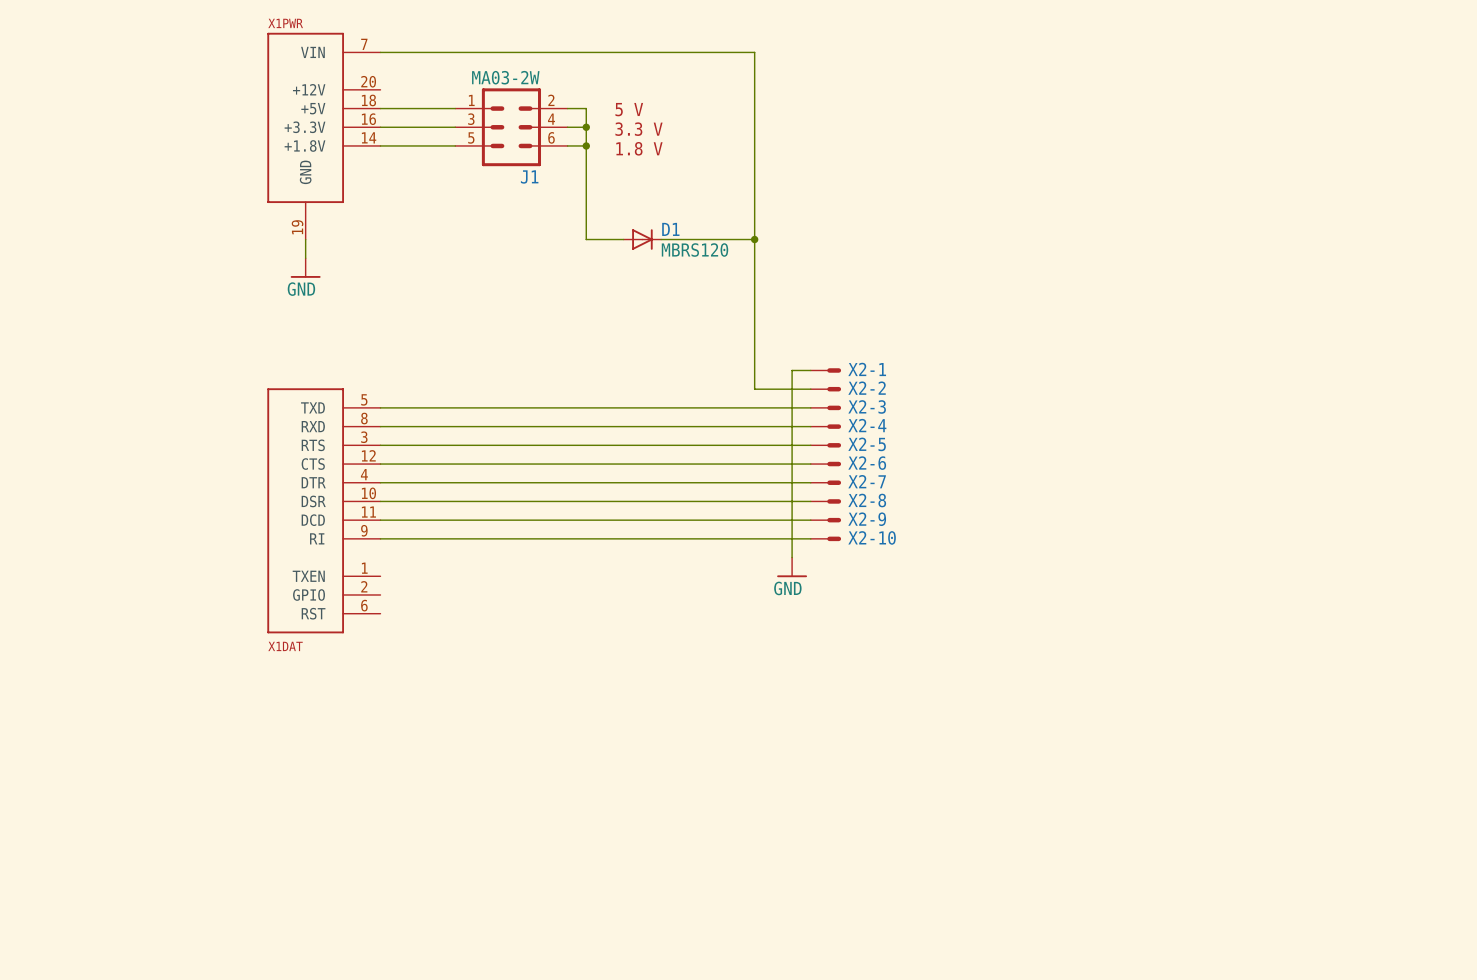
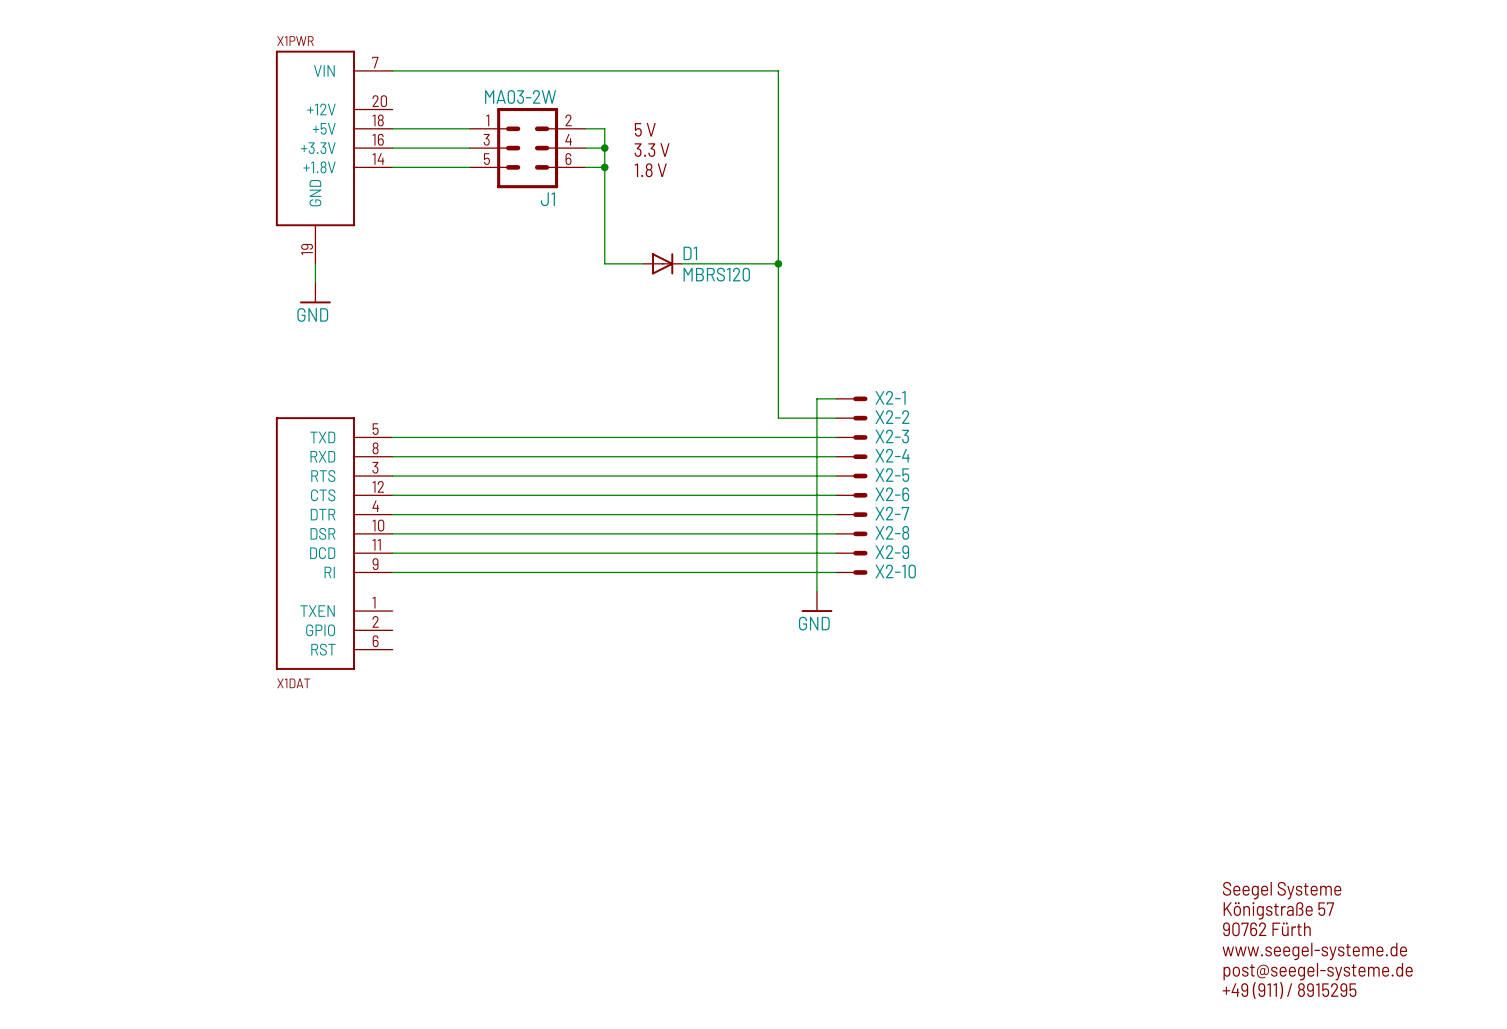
text: none -> Seegel Systeme (1282, 890)
text: none -> Königstraße 57 (1278, 910)
text: none -> 90762 Fürth (1266, 929)
text: none -> www.seegel-systeme.de (1314, 951)
text: none -> post@seegel-systeme.de (1318, 971)
text: none -> +49 (911) / 8915295 (1289, 990)

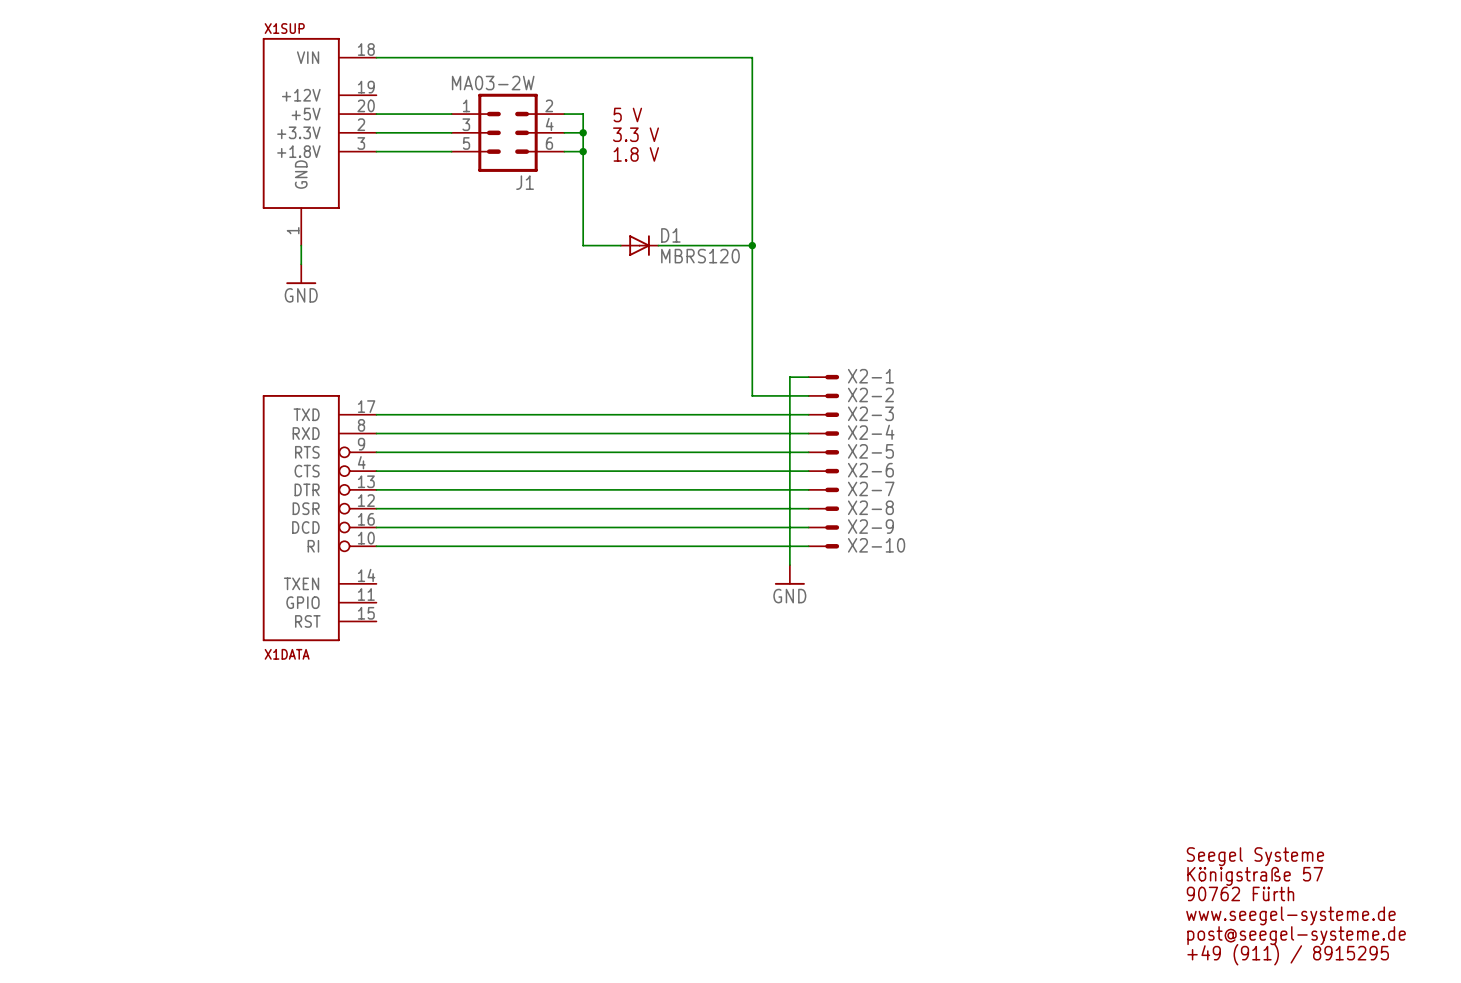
X1PWR name: X1PWR (295, 41) -> X1SUP (284, 28)
X1PWR pin number: 7 (375, 62) -> 18 (366, 49)
X1PWR pin number: 20 (379, 101) -> 19 (366, 87)
X1PWR pin number: 18 (378, 120) -> 20 (366, 105)
X1PWR pin number: 16 (378, 139) -> 2 (361, 124)
X1PWR pin number: 14 (378, 159) -> 3 (361, 143)
X1PWR pin number: 19 (307, 249) -> 1 (293, 230)
X1DAT: (334, 543) -> none
X1DATA: none -> (319, 518)

